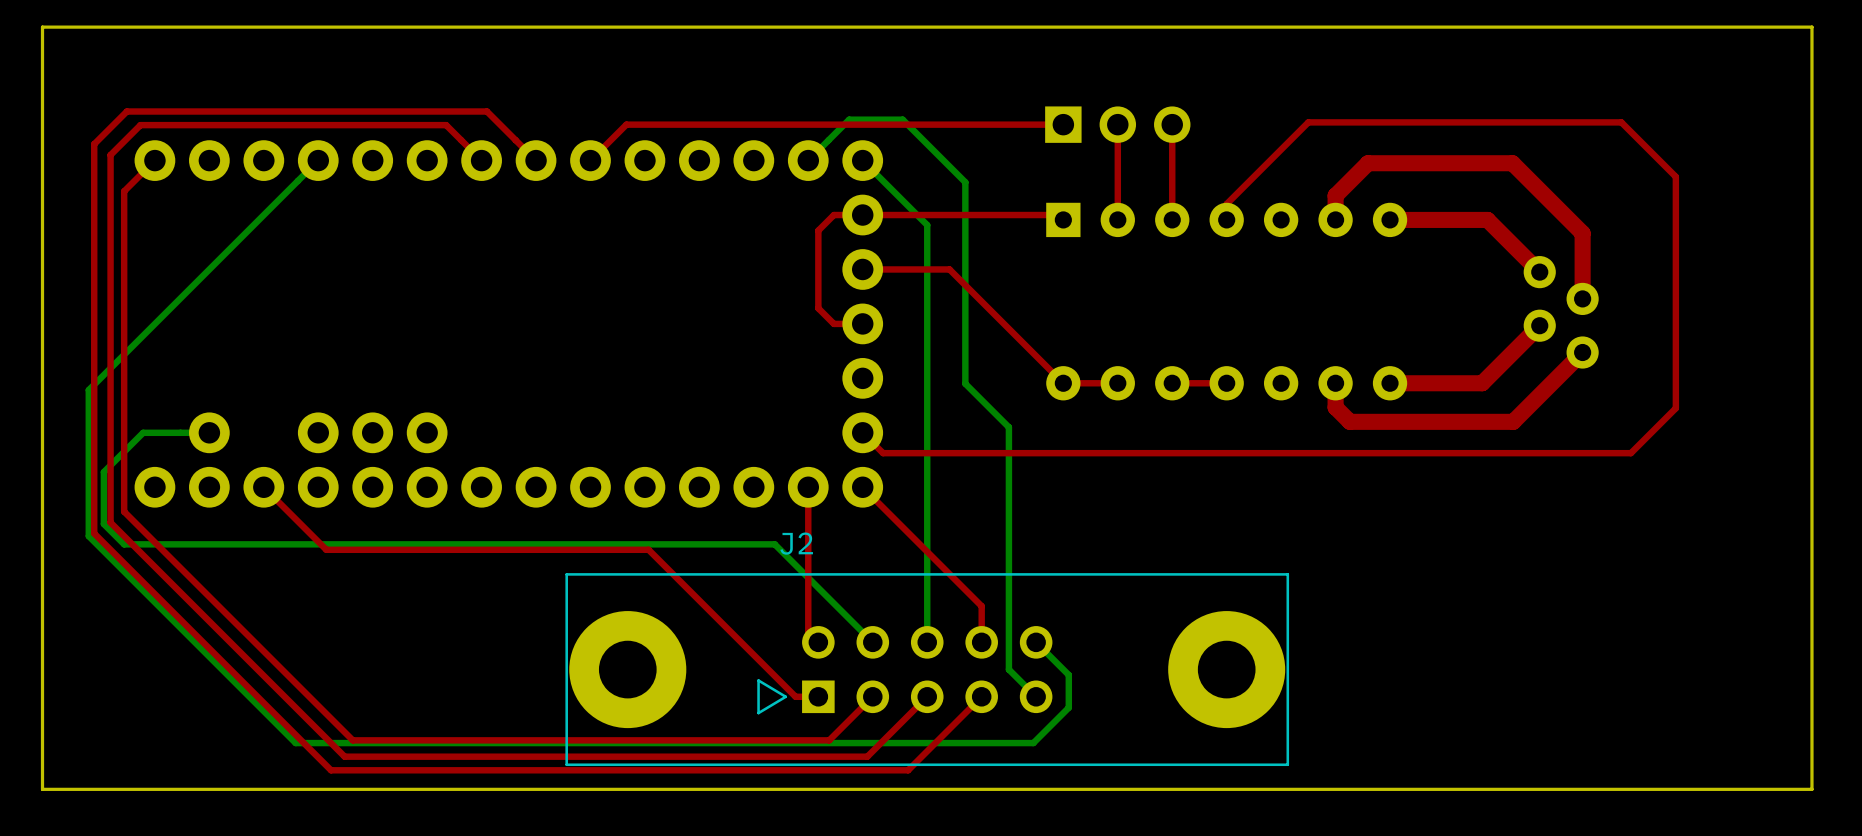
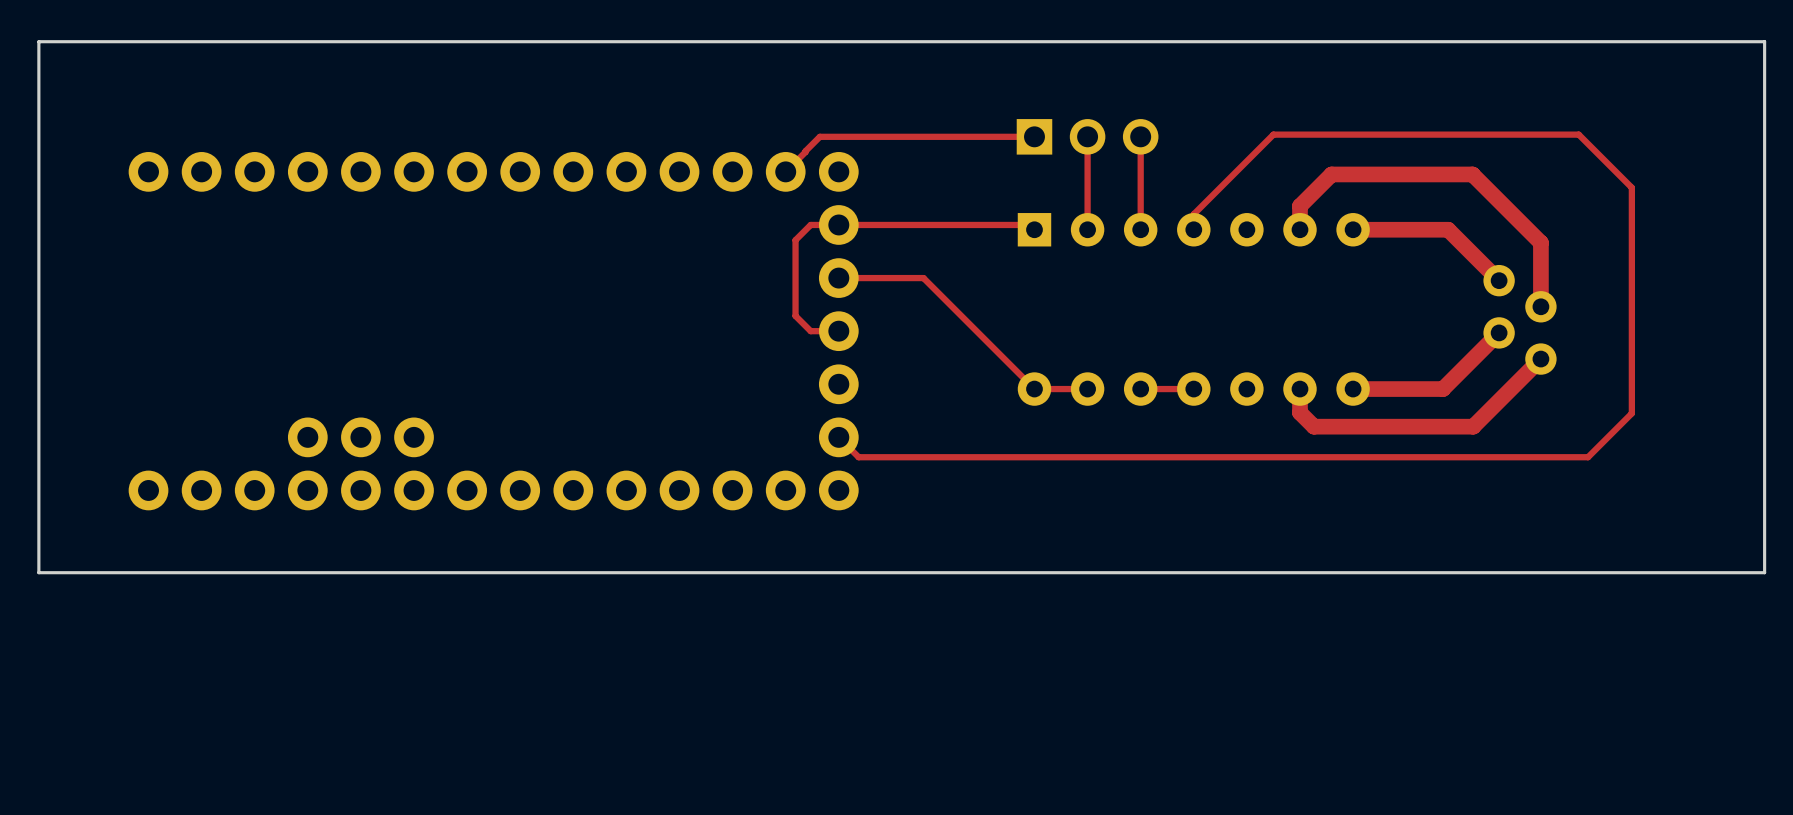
top track: (843, 124) (626, 124) (590, 160) -> (819, 136) (785, 171)
part footprint: [134, 140, 884, 508] -> [128, 152, 859, 511]
top track: (154, 160) (124, 191) (124, 511) (352, 740) (829, 740) (872, 696) -> none
bottom track: (318, 160) (88, 390) (88, 536) (295, 743) (1033, 743) (1068, 707) (1068, 675) (1036, 642) -> none
top track: (481, 160) (446, 125) (140, 125) (110, 155) (110, 522) (344, 756) (867, 756) (927, 696) -> none
top track: (536, 160) (486, 111) (126, 111) (94, 144) (94, 533) (331, 770) (908, 770) (981, 696) (981, 691) -> none
bottom track: (808, 160) (849, 119) (902, 119) (965, 182) (965, 383) (1008, 427) (1008, 669) (1036, 696) -> none
bottom track: (862, 160) (927, 225) (927, 642) -> none
bottom track: (209, 432) (143, 432) (103, 472) (103, 524) (124, 544) (774, 544) (872, 642) -> none
top track: (263, 487) (326, 549) (648, 549) (795, 696) (818, 696) -> none
top track: (808, 487) (808, 632) (818, 642) -> none
top track: (862, 487) (981, 606) (981, 642) -> none
board edge: (42, 571) (42, 789) (1811, 789) (1811, 571) -> (38, 572) (1764, 572)
J2: (927, 669) -> none

